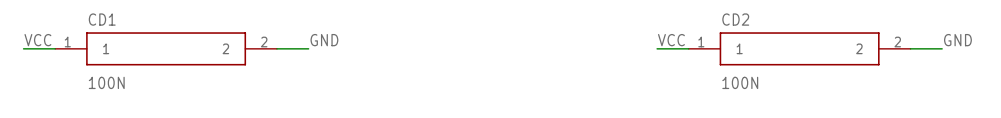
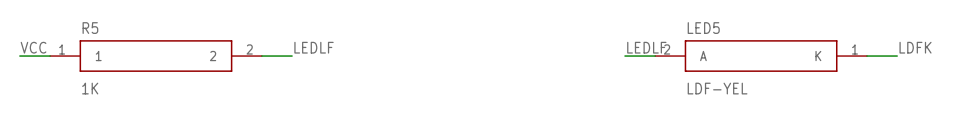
CD1 name: CD1 (102, 19) -> R5 (90, 28)
CD2 name: CD2 (735, 19) -> LED5 (703, 28)
label: GND (324, 40) -> LEDLF (314, 47)
label: VCC (671, 40) -> LEDLF (646, 47)
label: GND (957, 40) -> LDFK (915, 47)
CD2 pin number: 1 (701, 42) -> 2 (667, 49)
CD2 pin number: 2 (897, 42) -> 1 (854, 49)
CD2 pin name: 1 (739, 48) -> A (703, 56)
CD2 pin name: 2 (859, 48) -> K (818, 56)
CD1 value: 100N (106, 82) -> 1K (90, 88)
CD2 value: 100N (740, 82) -> LDF-YEL (717, 88)

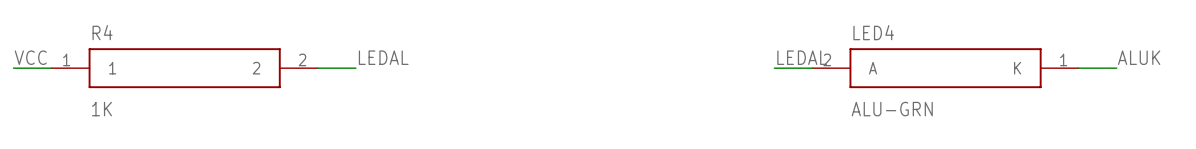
R5 name: R5 (90, 28) -> R4 (102, 32)
LED5 name: LED5 (703, 28) -> LED4 (873, 32)
label: LEDLF (314, 47) -> LEDAL (383, 57)
label: LEDLF (646, 47) -> LEDAL (802, 57)
label: LDFK (915, 47) -> ALUK (1139, 57)
LED5 value: LDF-YEL (717, 88) -> ALU-GRN (892, 109)

